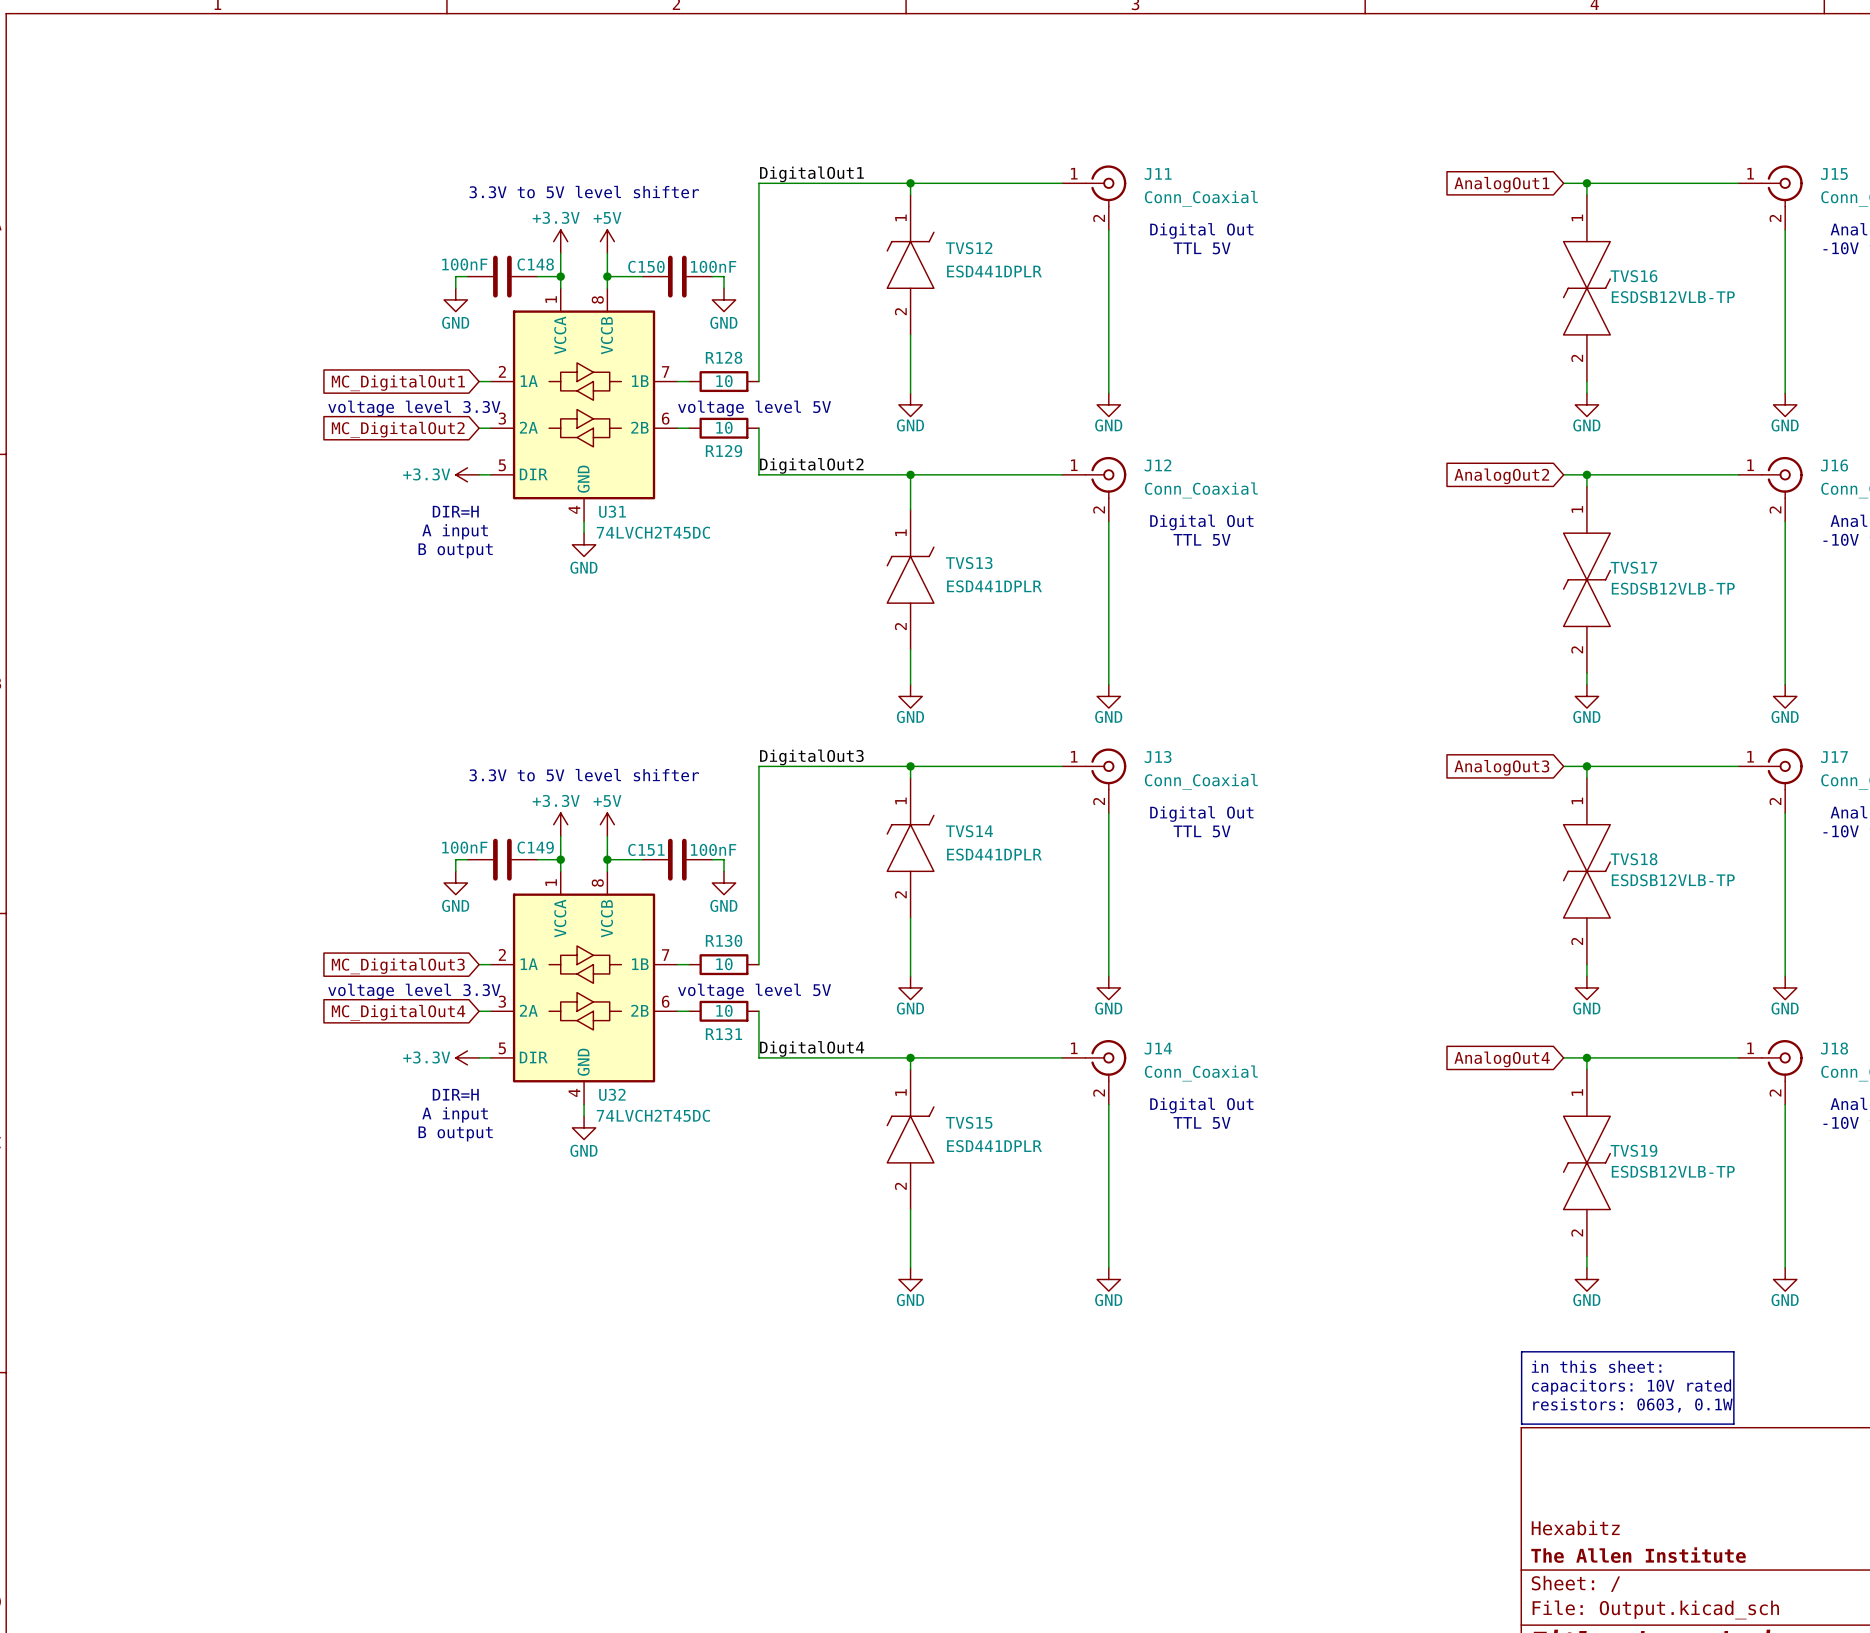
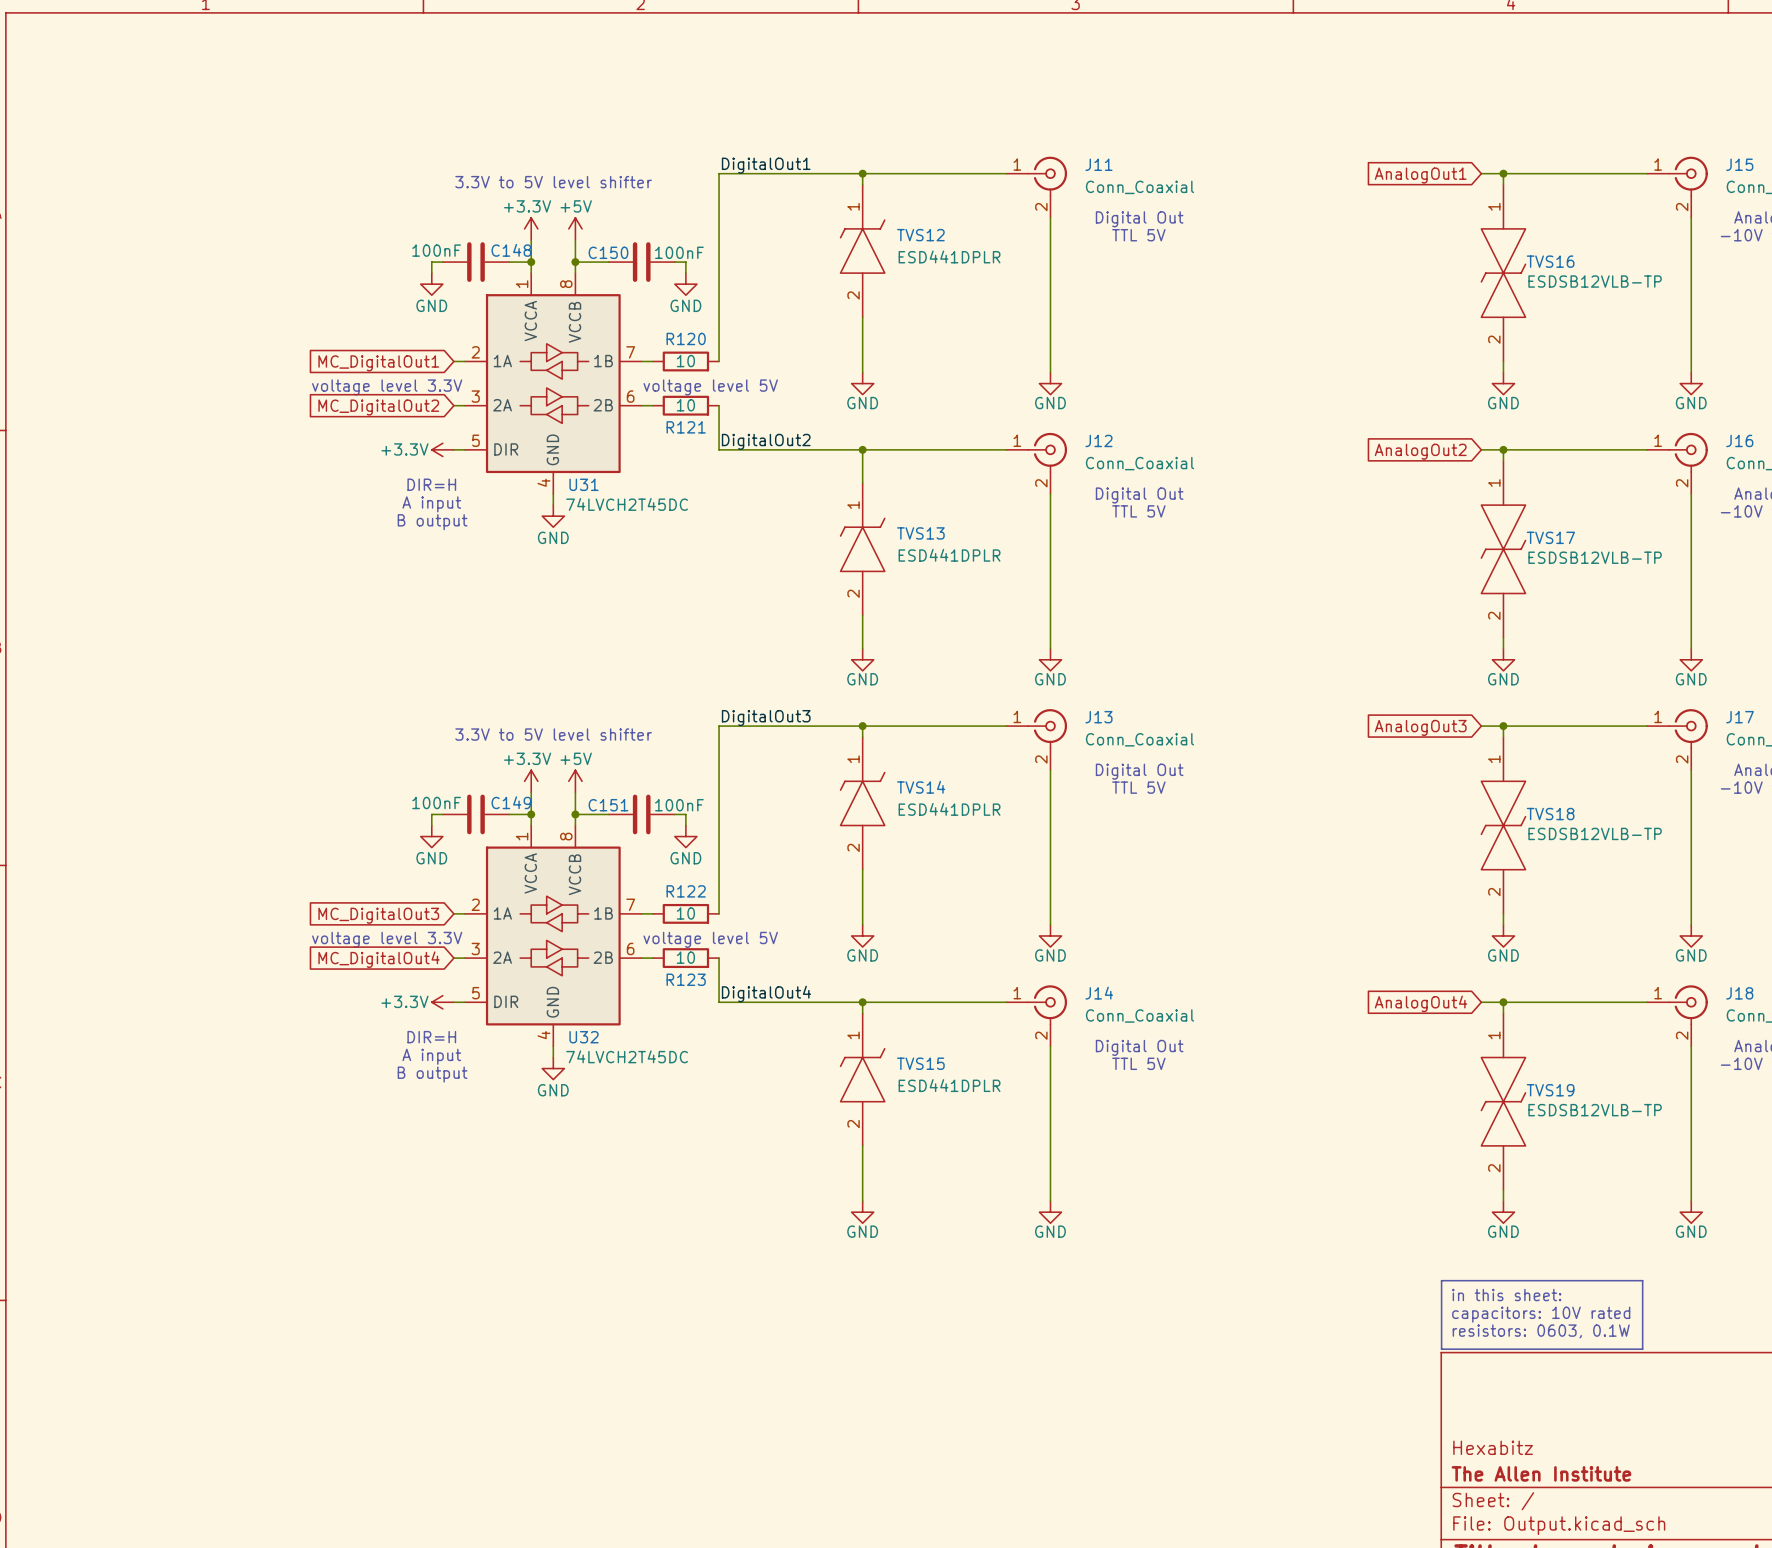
R128 name: R128 (724, 357) -> R120 (686, 338)
R129 name: R129 (724, 451) -> R121 (686, 427)
R130 name: R130 (724, 940) -> R122 (686, 891)
R131 name: R131 (724, 1034) -> R123 (686, 979)

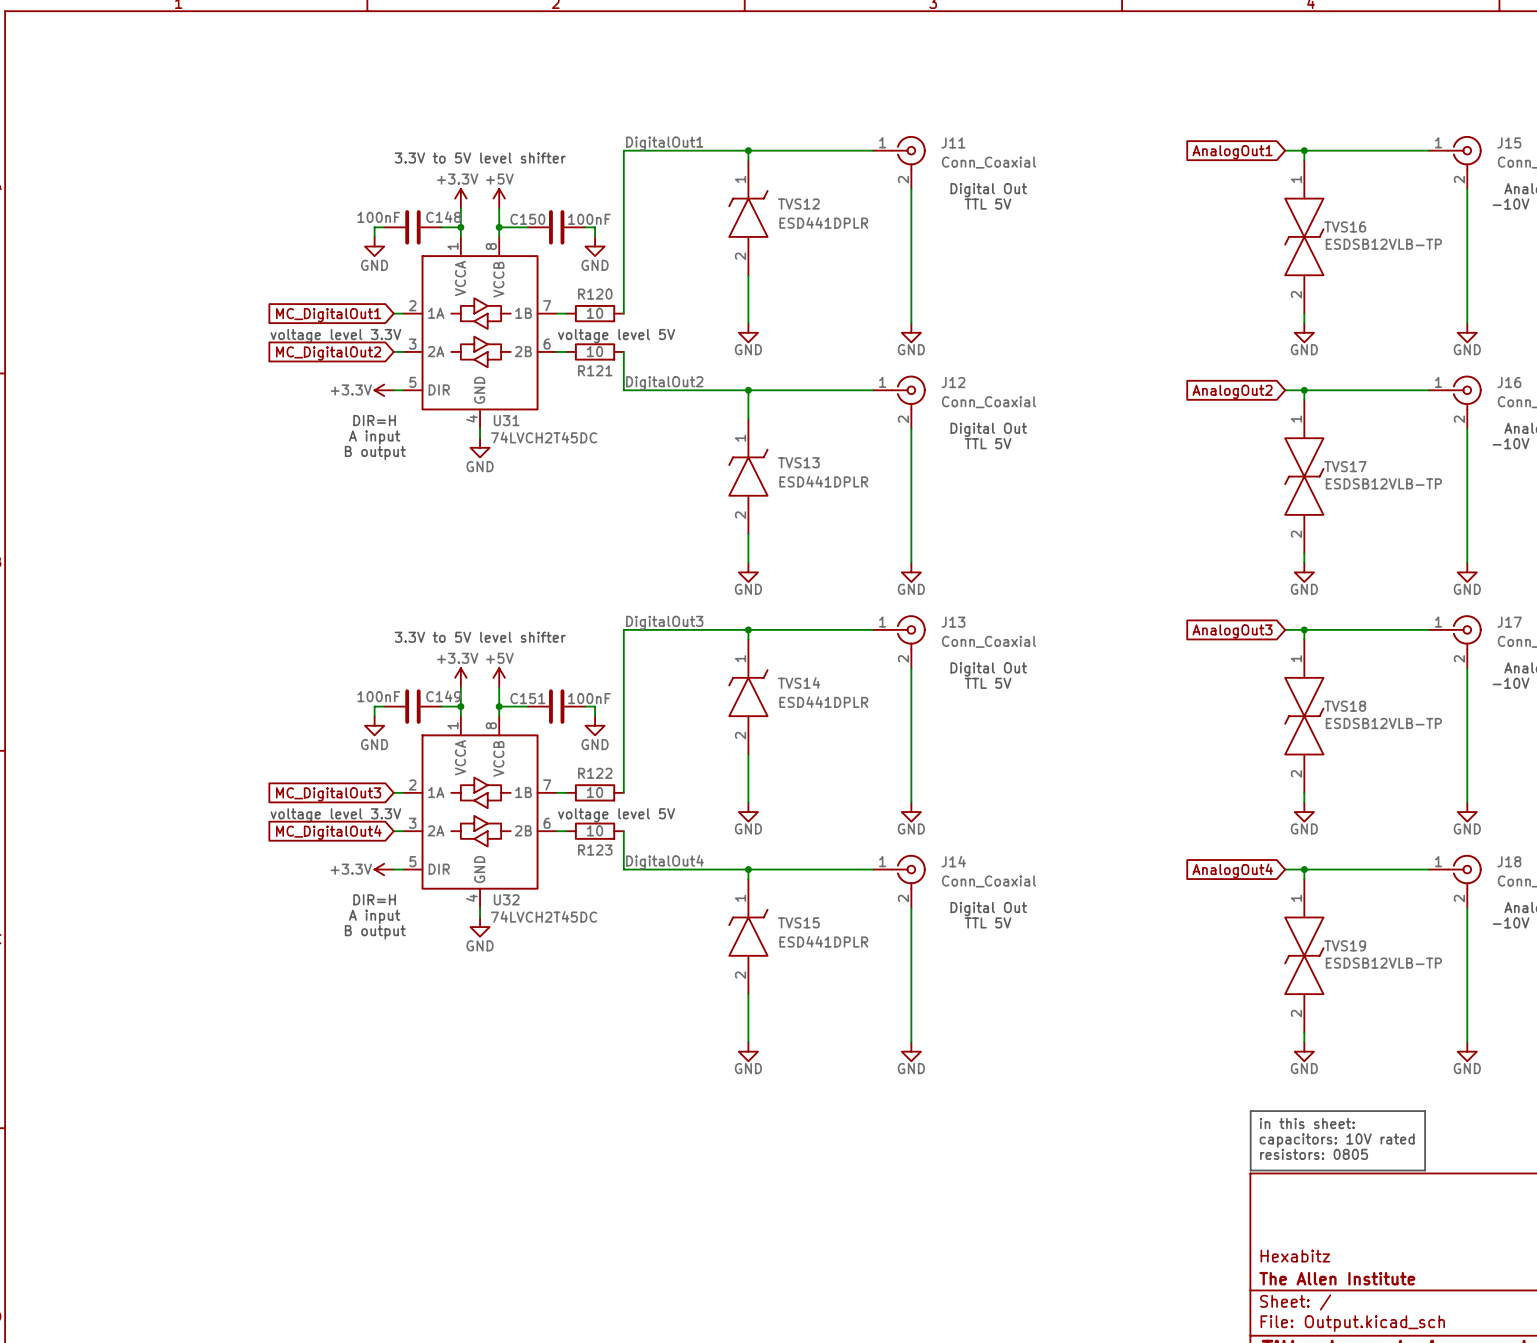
text: resistors: 0603, 0.1W (1541, 1331) -> resistors: 0805 (1314, 1154)

